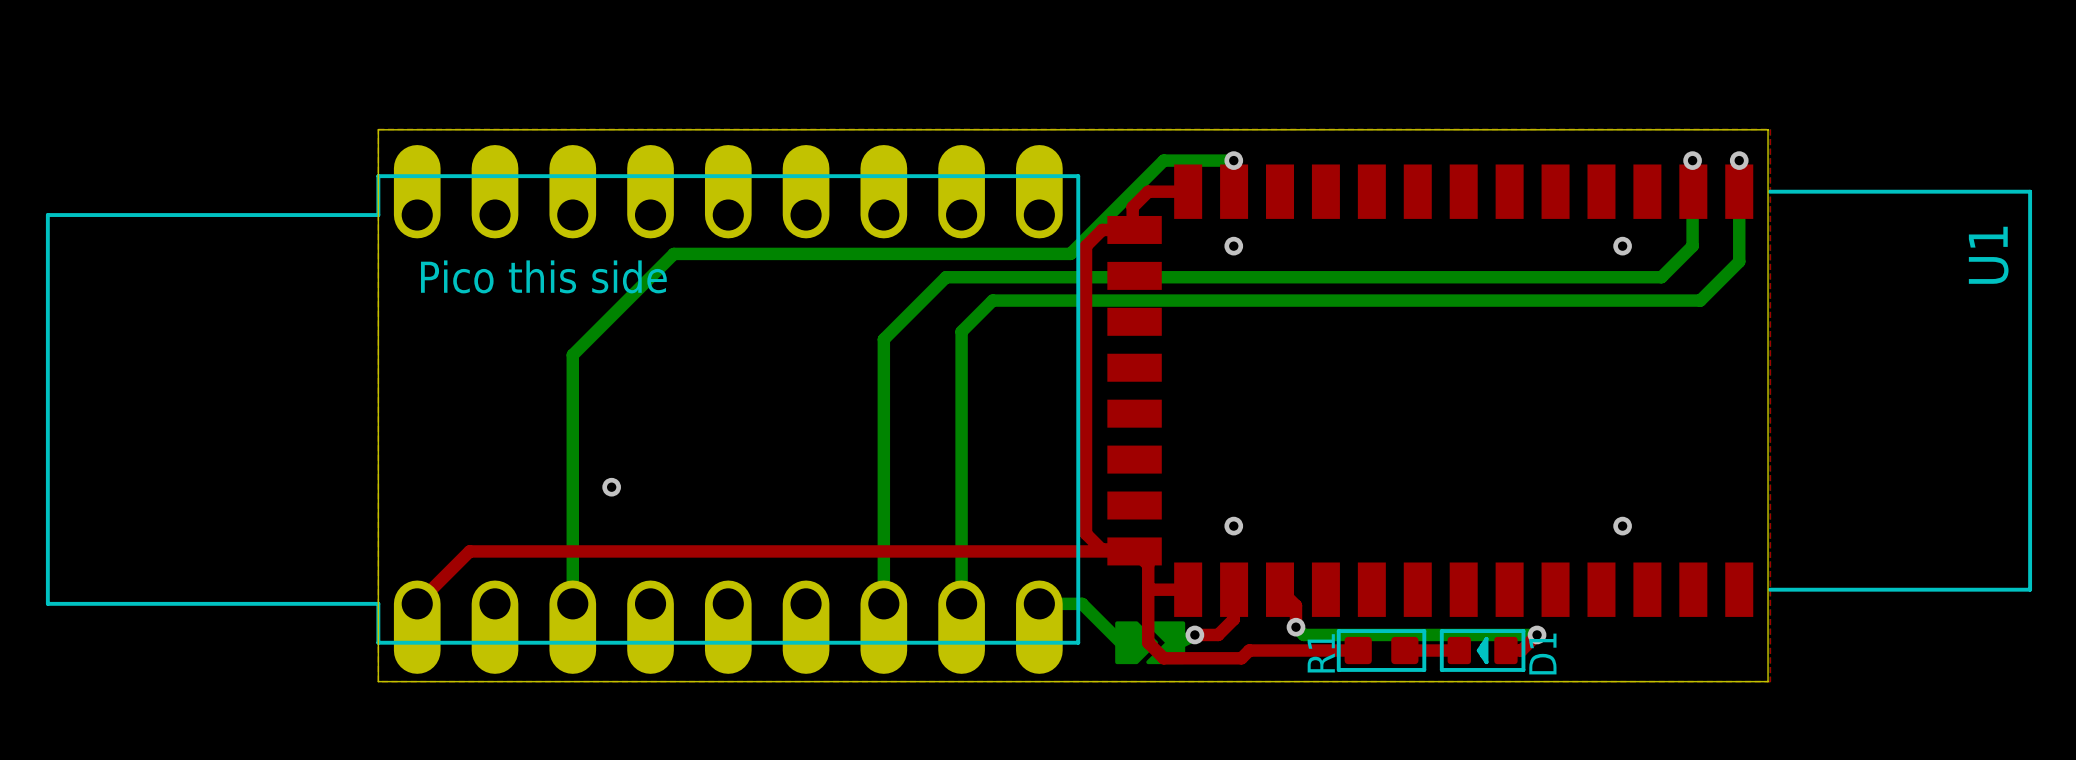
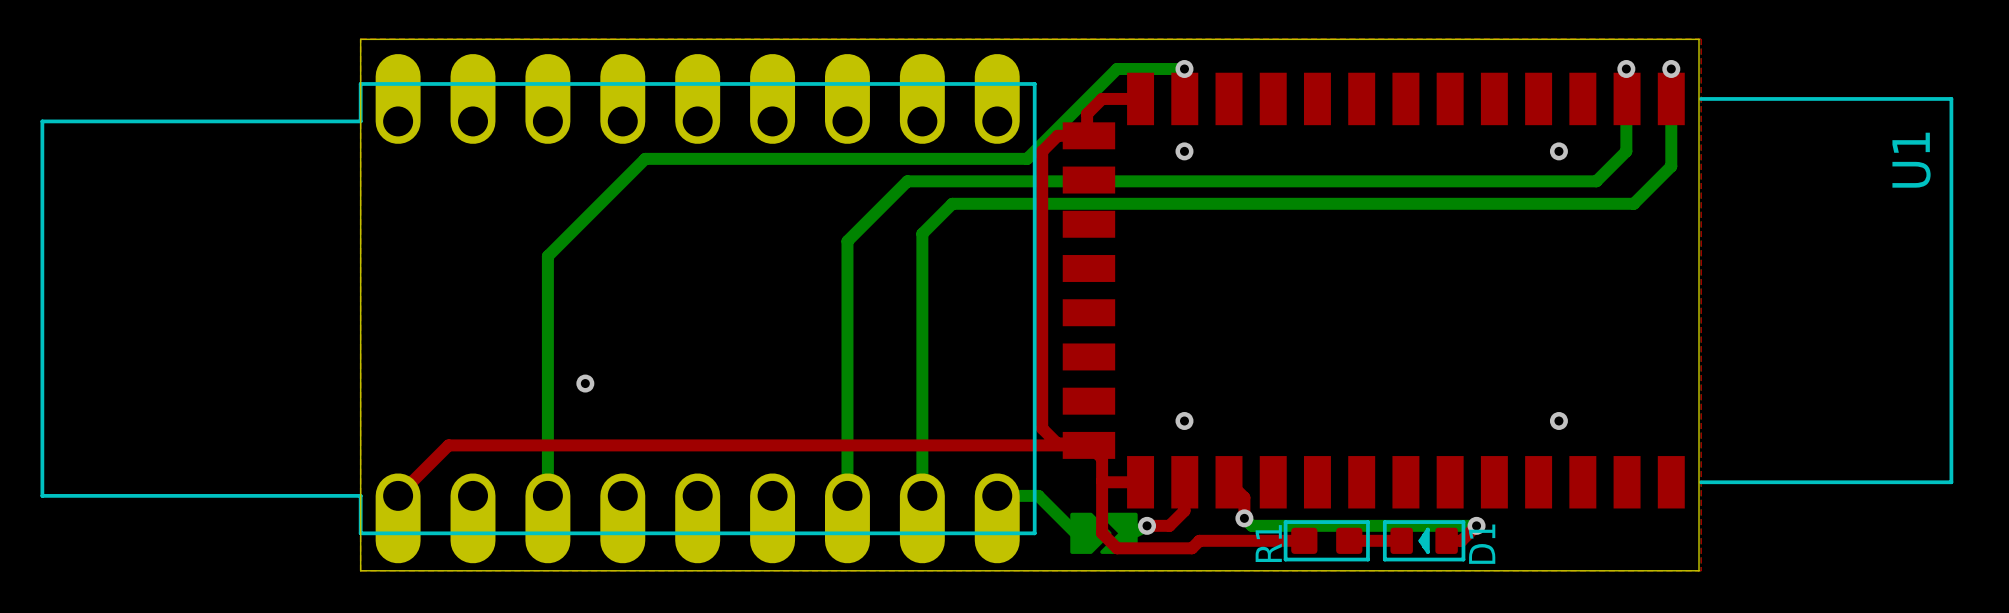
text: Pico this side (543, 276) -> none

